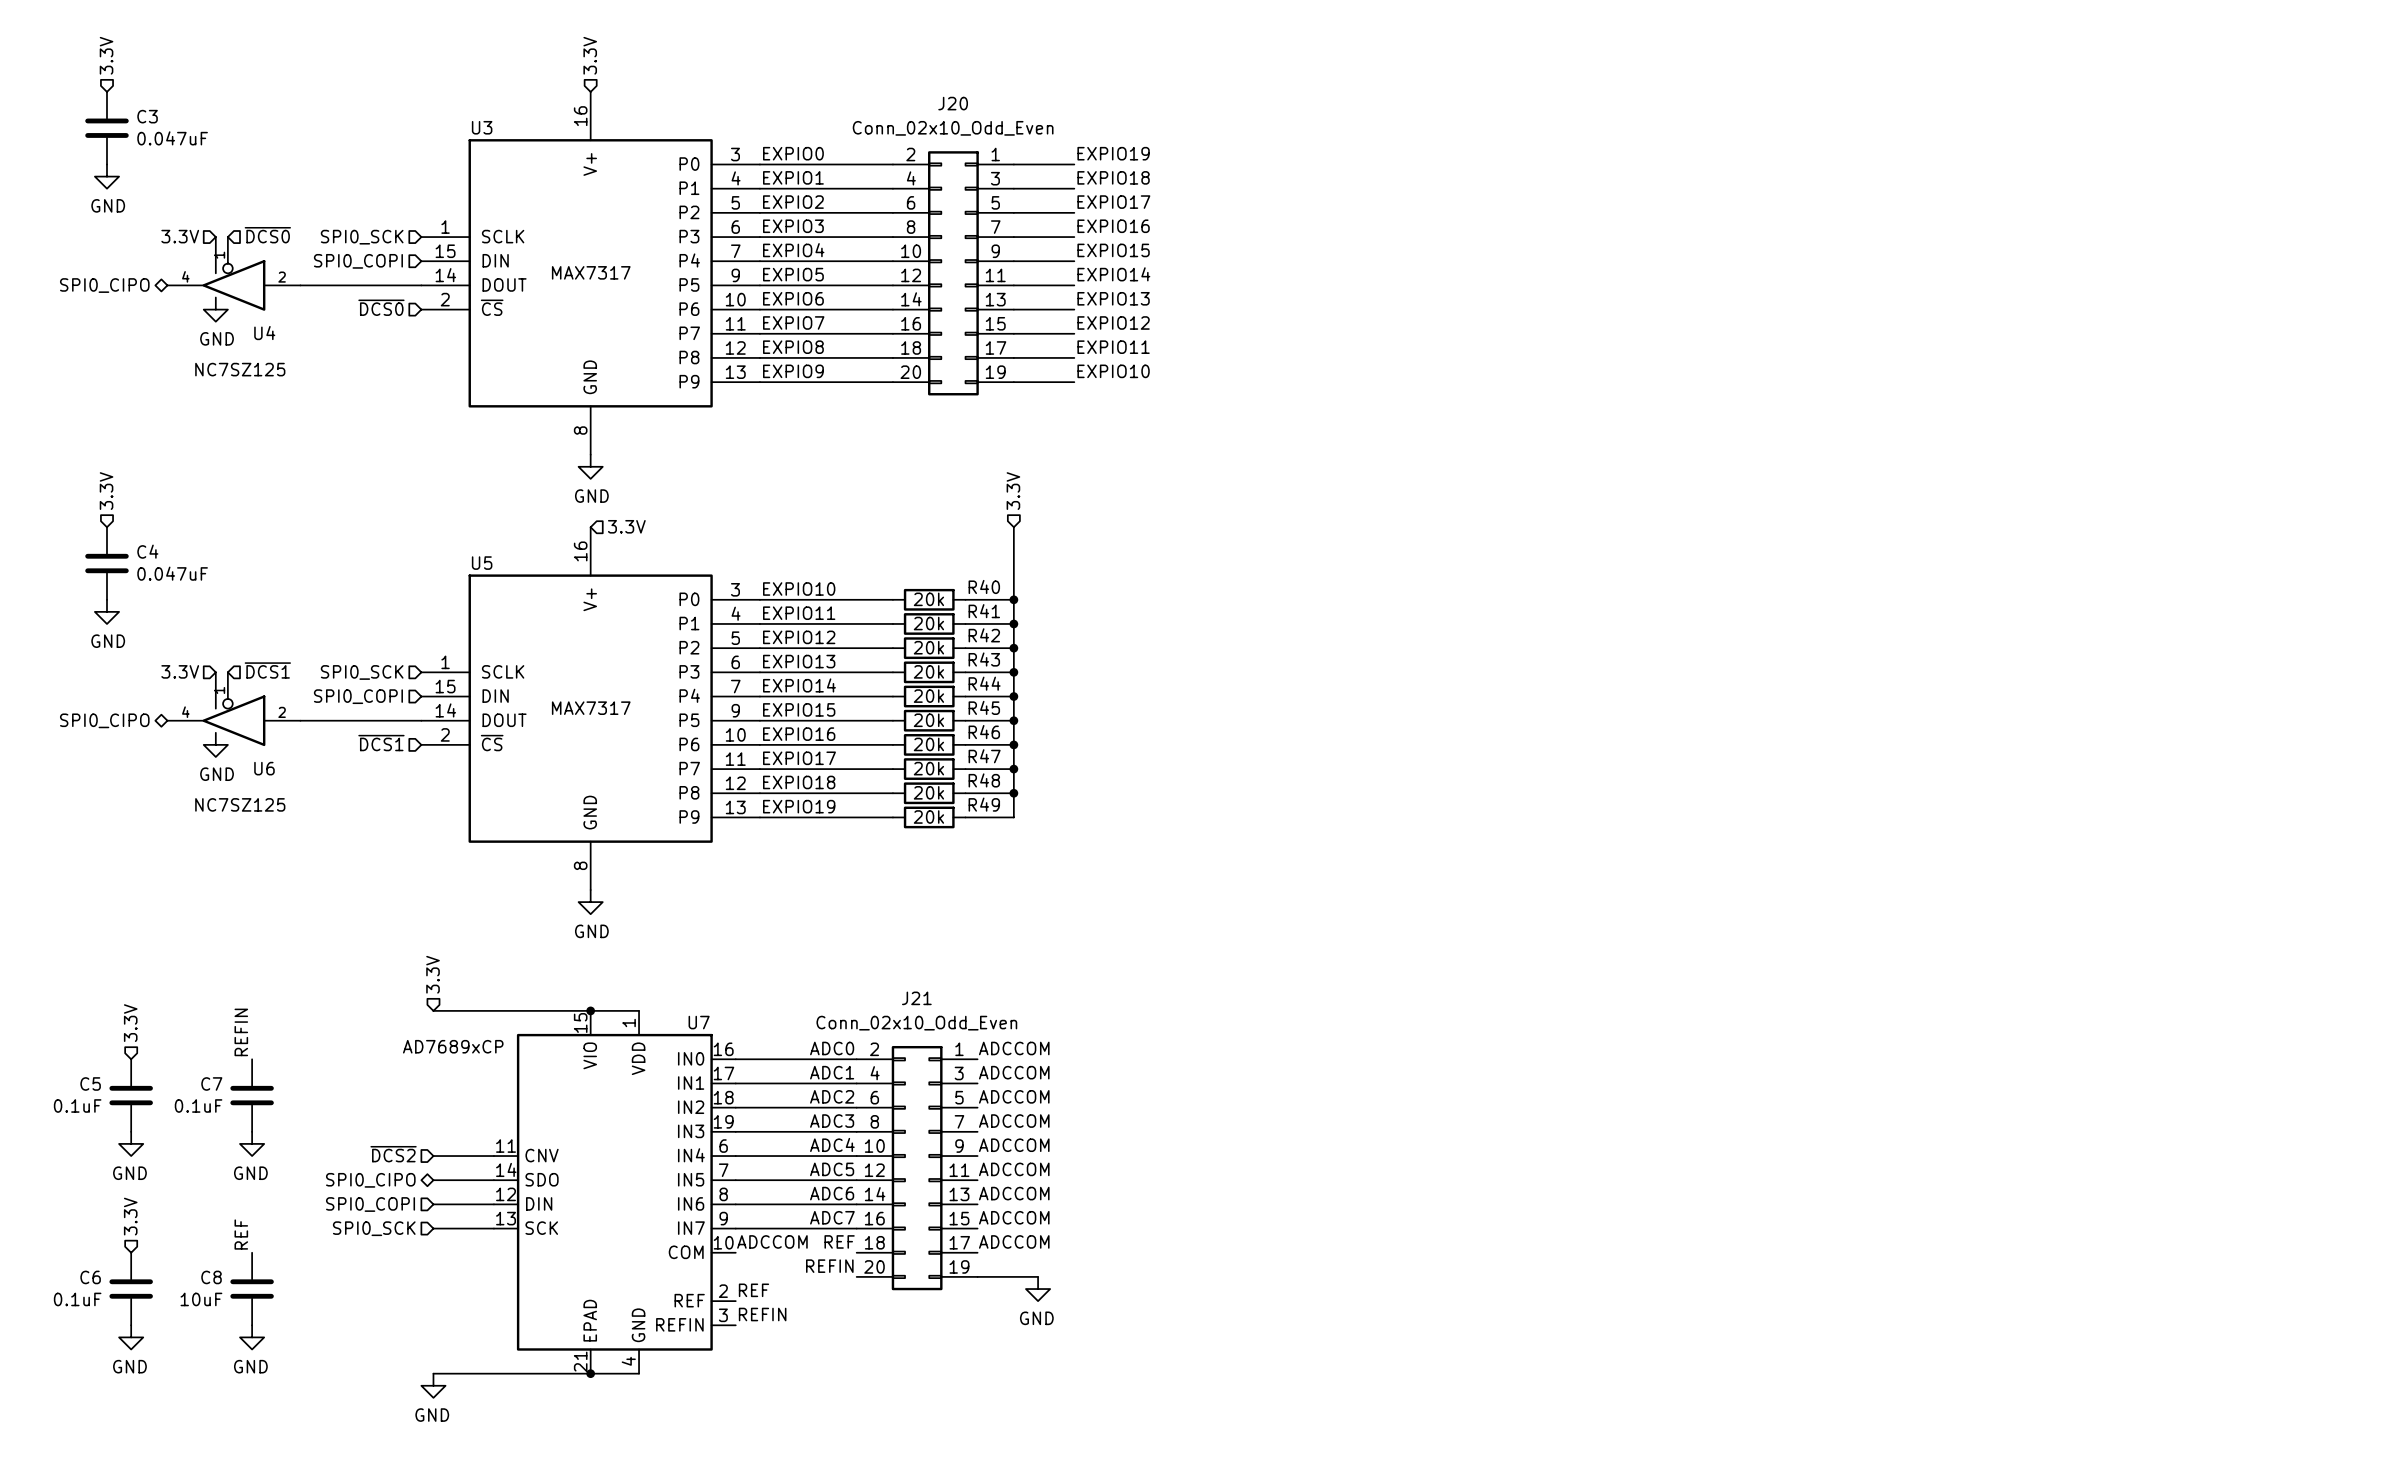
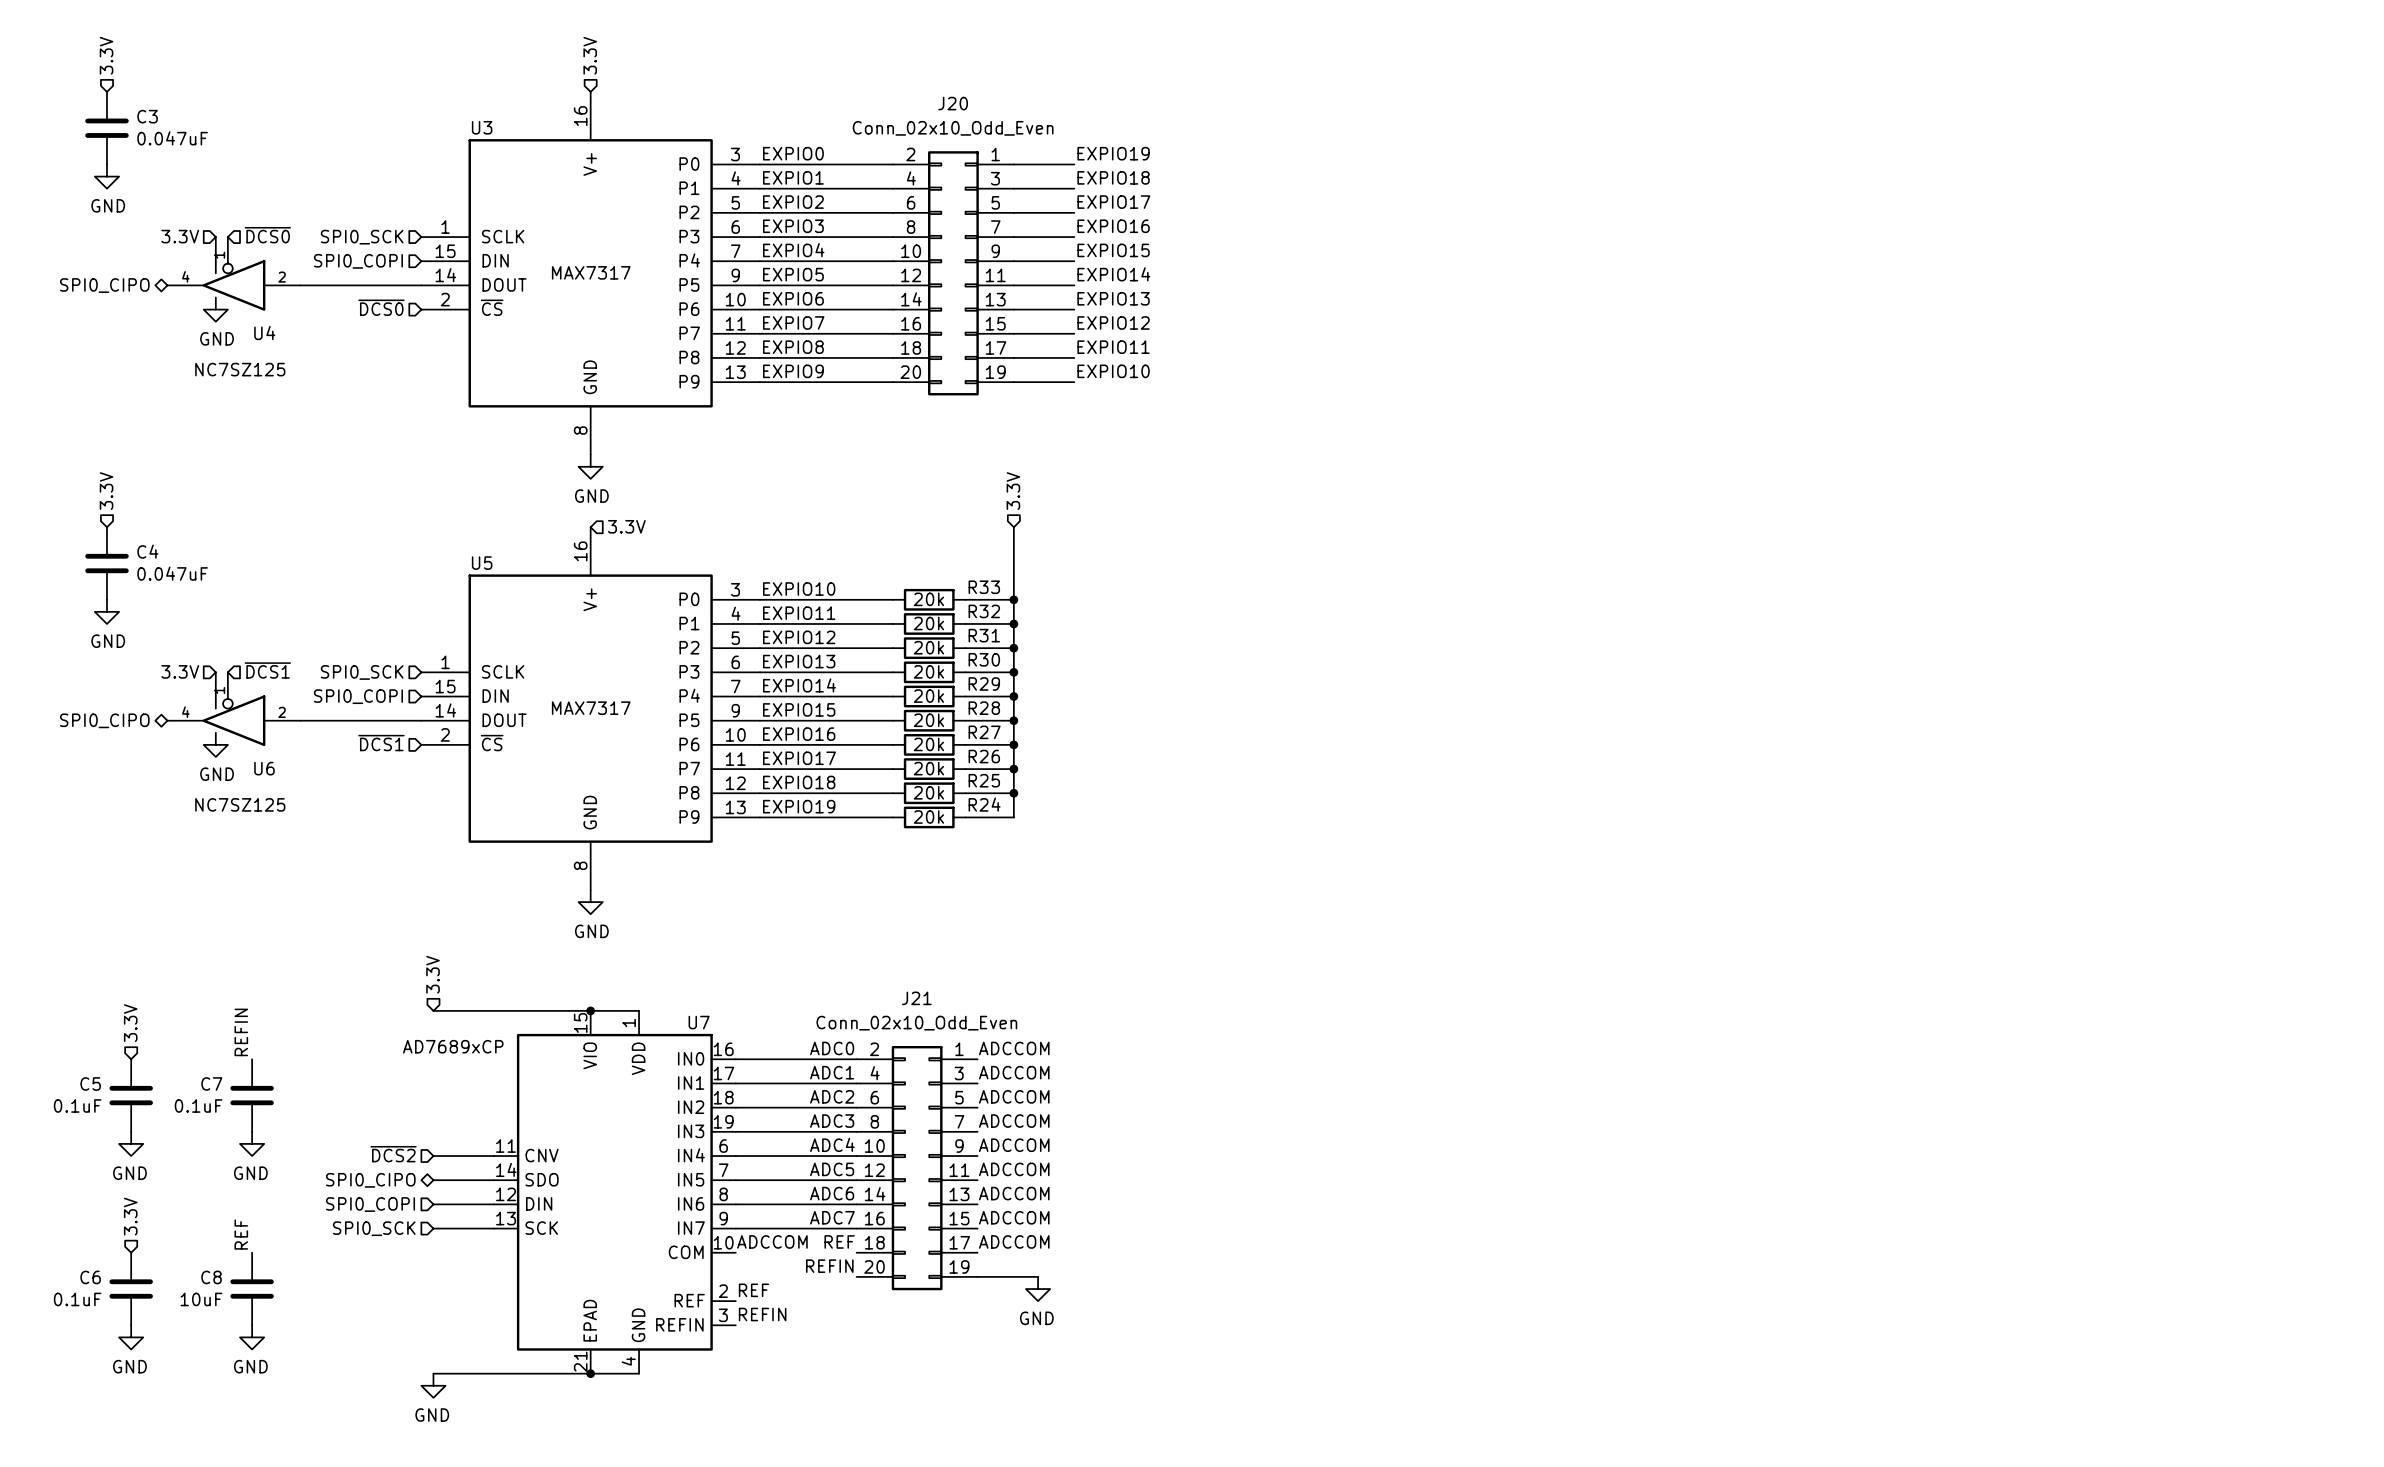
R40 name: R40 (984, 586) -> R33 (984, 587)
R41 name: R41 (984, 611) -> R32 (984, 611)
R42 name: R42 (984, 635) -> R31 (984, 635)
R43 name: R43 (984, 659) -> R30 (984, 659)
R44 name: R44 (984, 683) -> R29 (984, 683)
R45 name: R45 (984, 707) -> R28 (984, 708)
R46 name: R46 (984, 732) -> R27 (984, 732)
R47 name: R47 (984, 756) -> R26 (984, 756)
R48 name: R48 (984, 780) -> R25 (984, 780)
R49 name: R49 (984, 804) -> R24 (984, 804)

